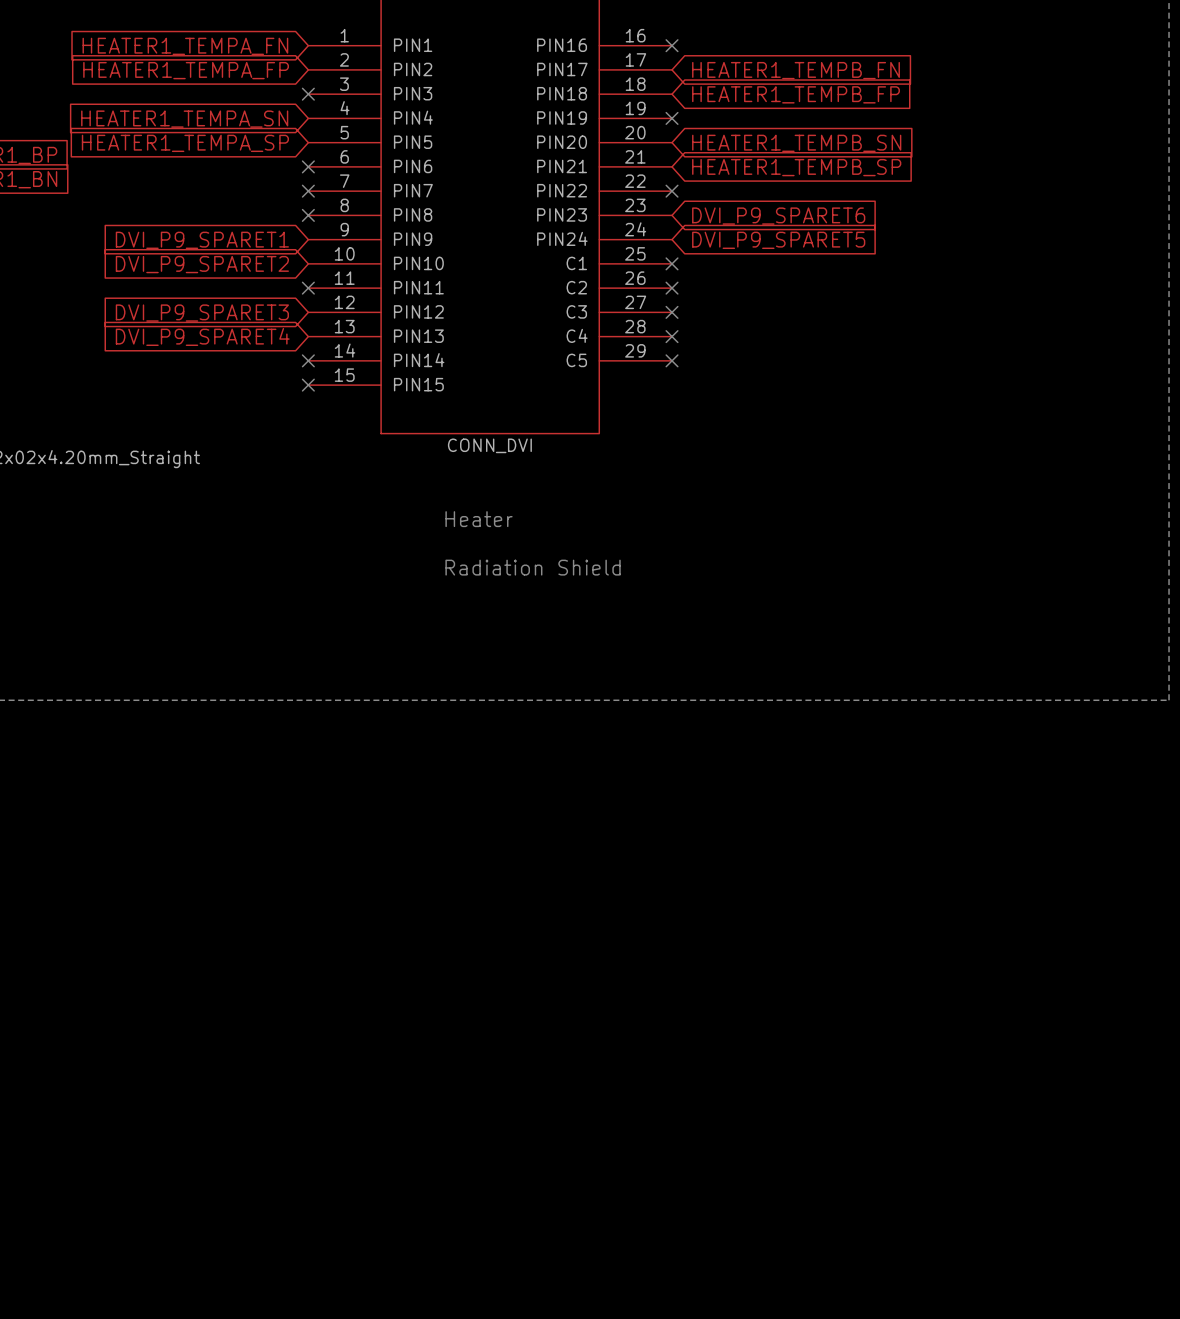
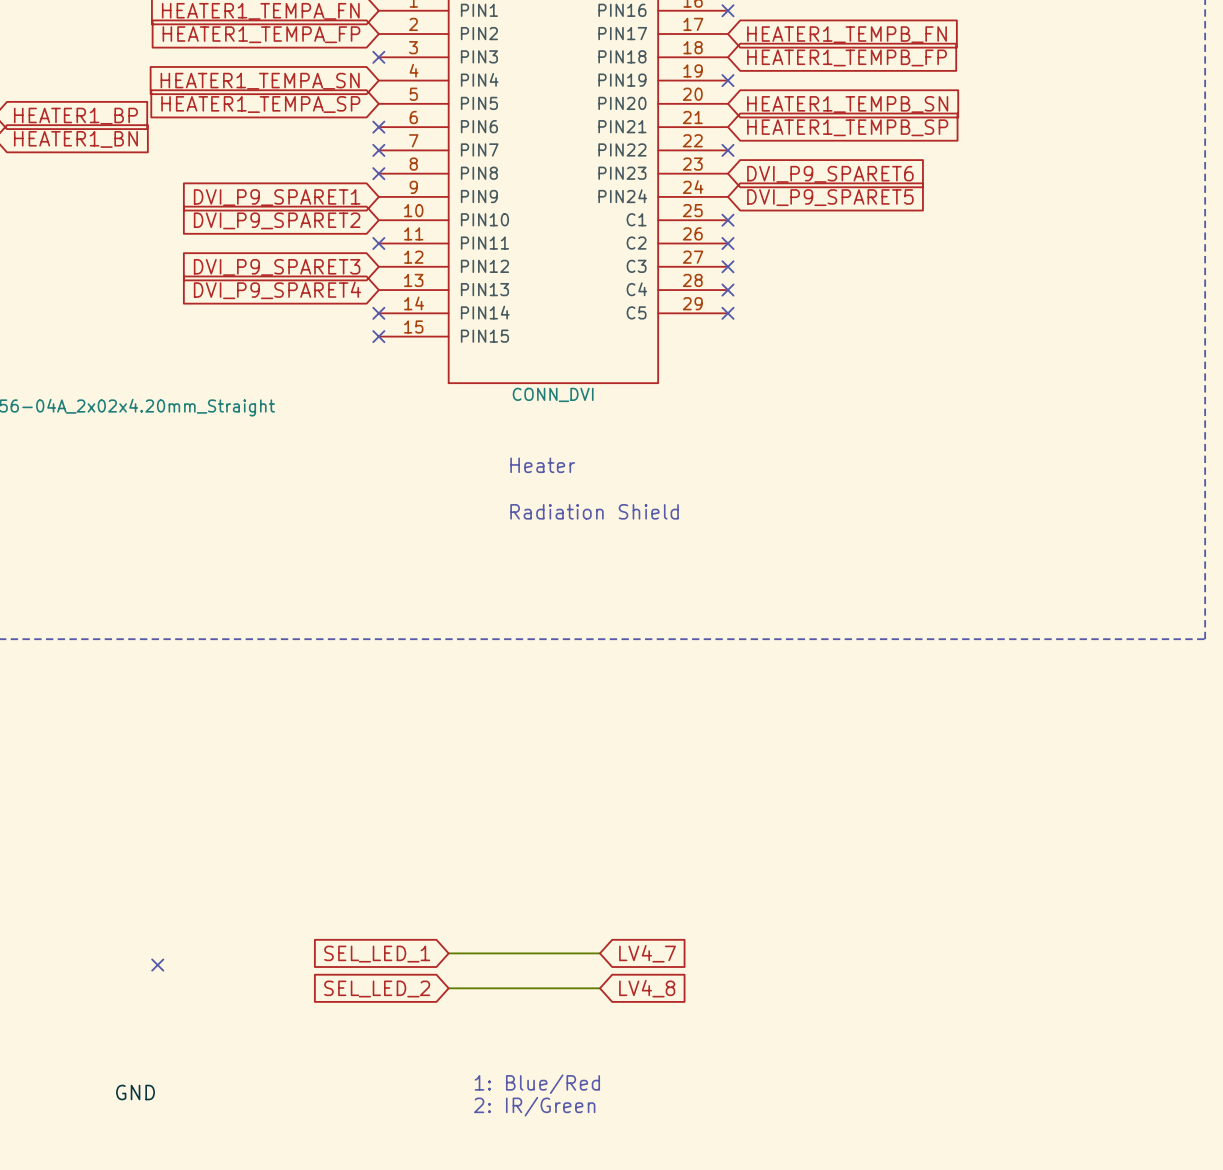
wire: none -> (448, 953) (599, 953)
global label: none -> LV4_7 (647, 953)
global label: none -> SEL_LED_1 (377, 954)
no-connect mark: none -> (157, 965)
wire: none -> (448, 988) (599, 988)
global label: none -> SEL_LED_2 (377, 988)
global label: none -> LV4_8 (647, 988)
text: none -> 1: Blue/Red (537, 1084)
label: none -> GND (135, 1092)
text: none -> 2: IR/Green (534, 1106)

